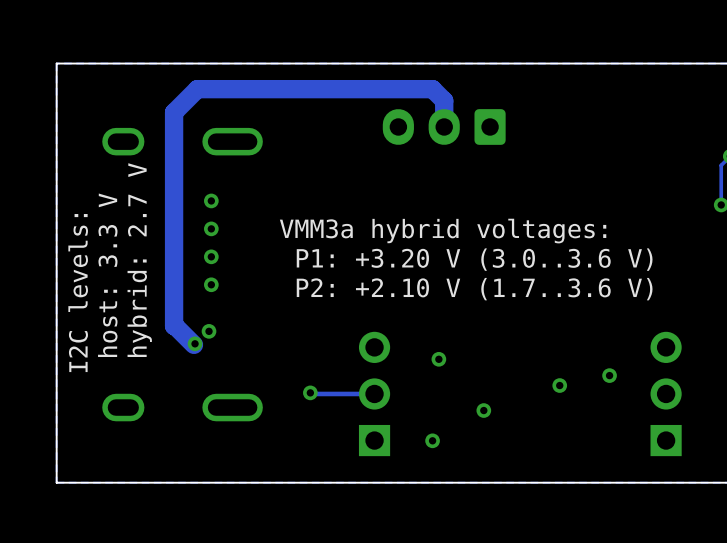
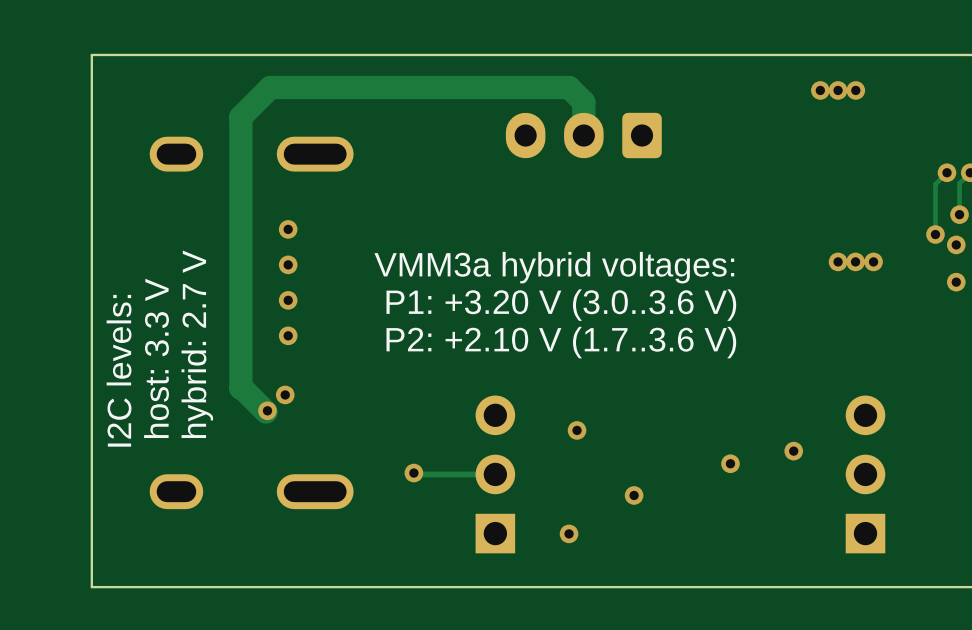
via: none -> (820, 90)
via: none -> (838, 90)
via: none -> (855, 90)
via: none -> (838, 261)
via: none -> (855, 261)
via: none -> (873, 261)

